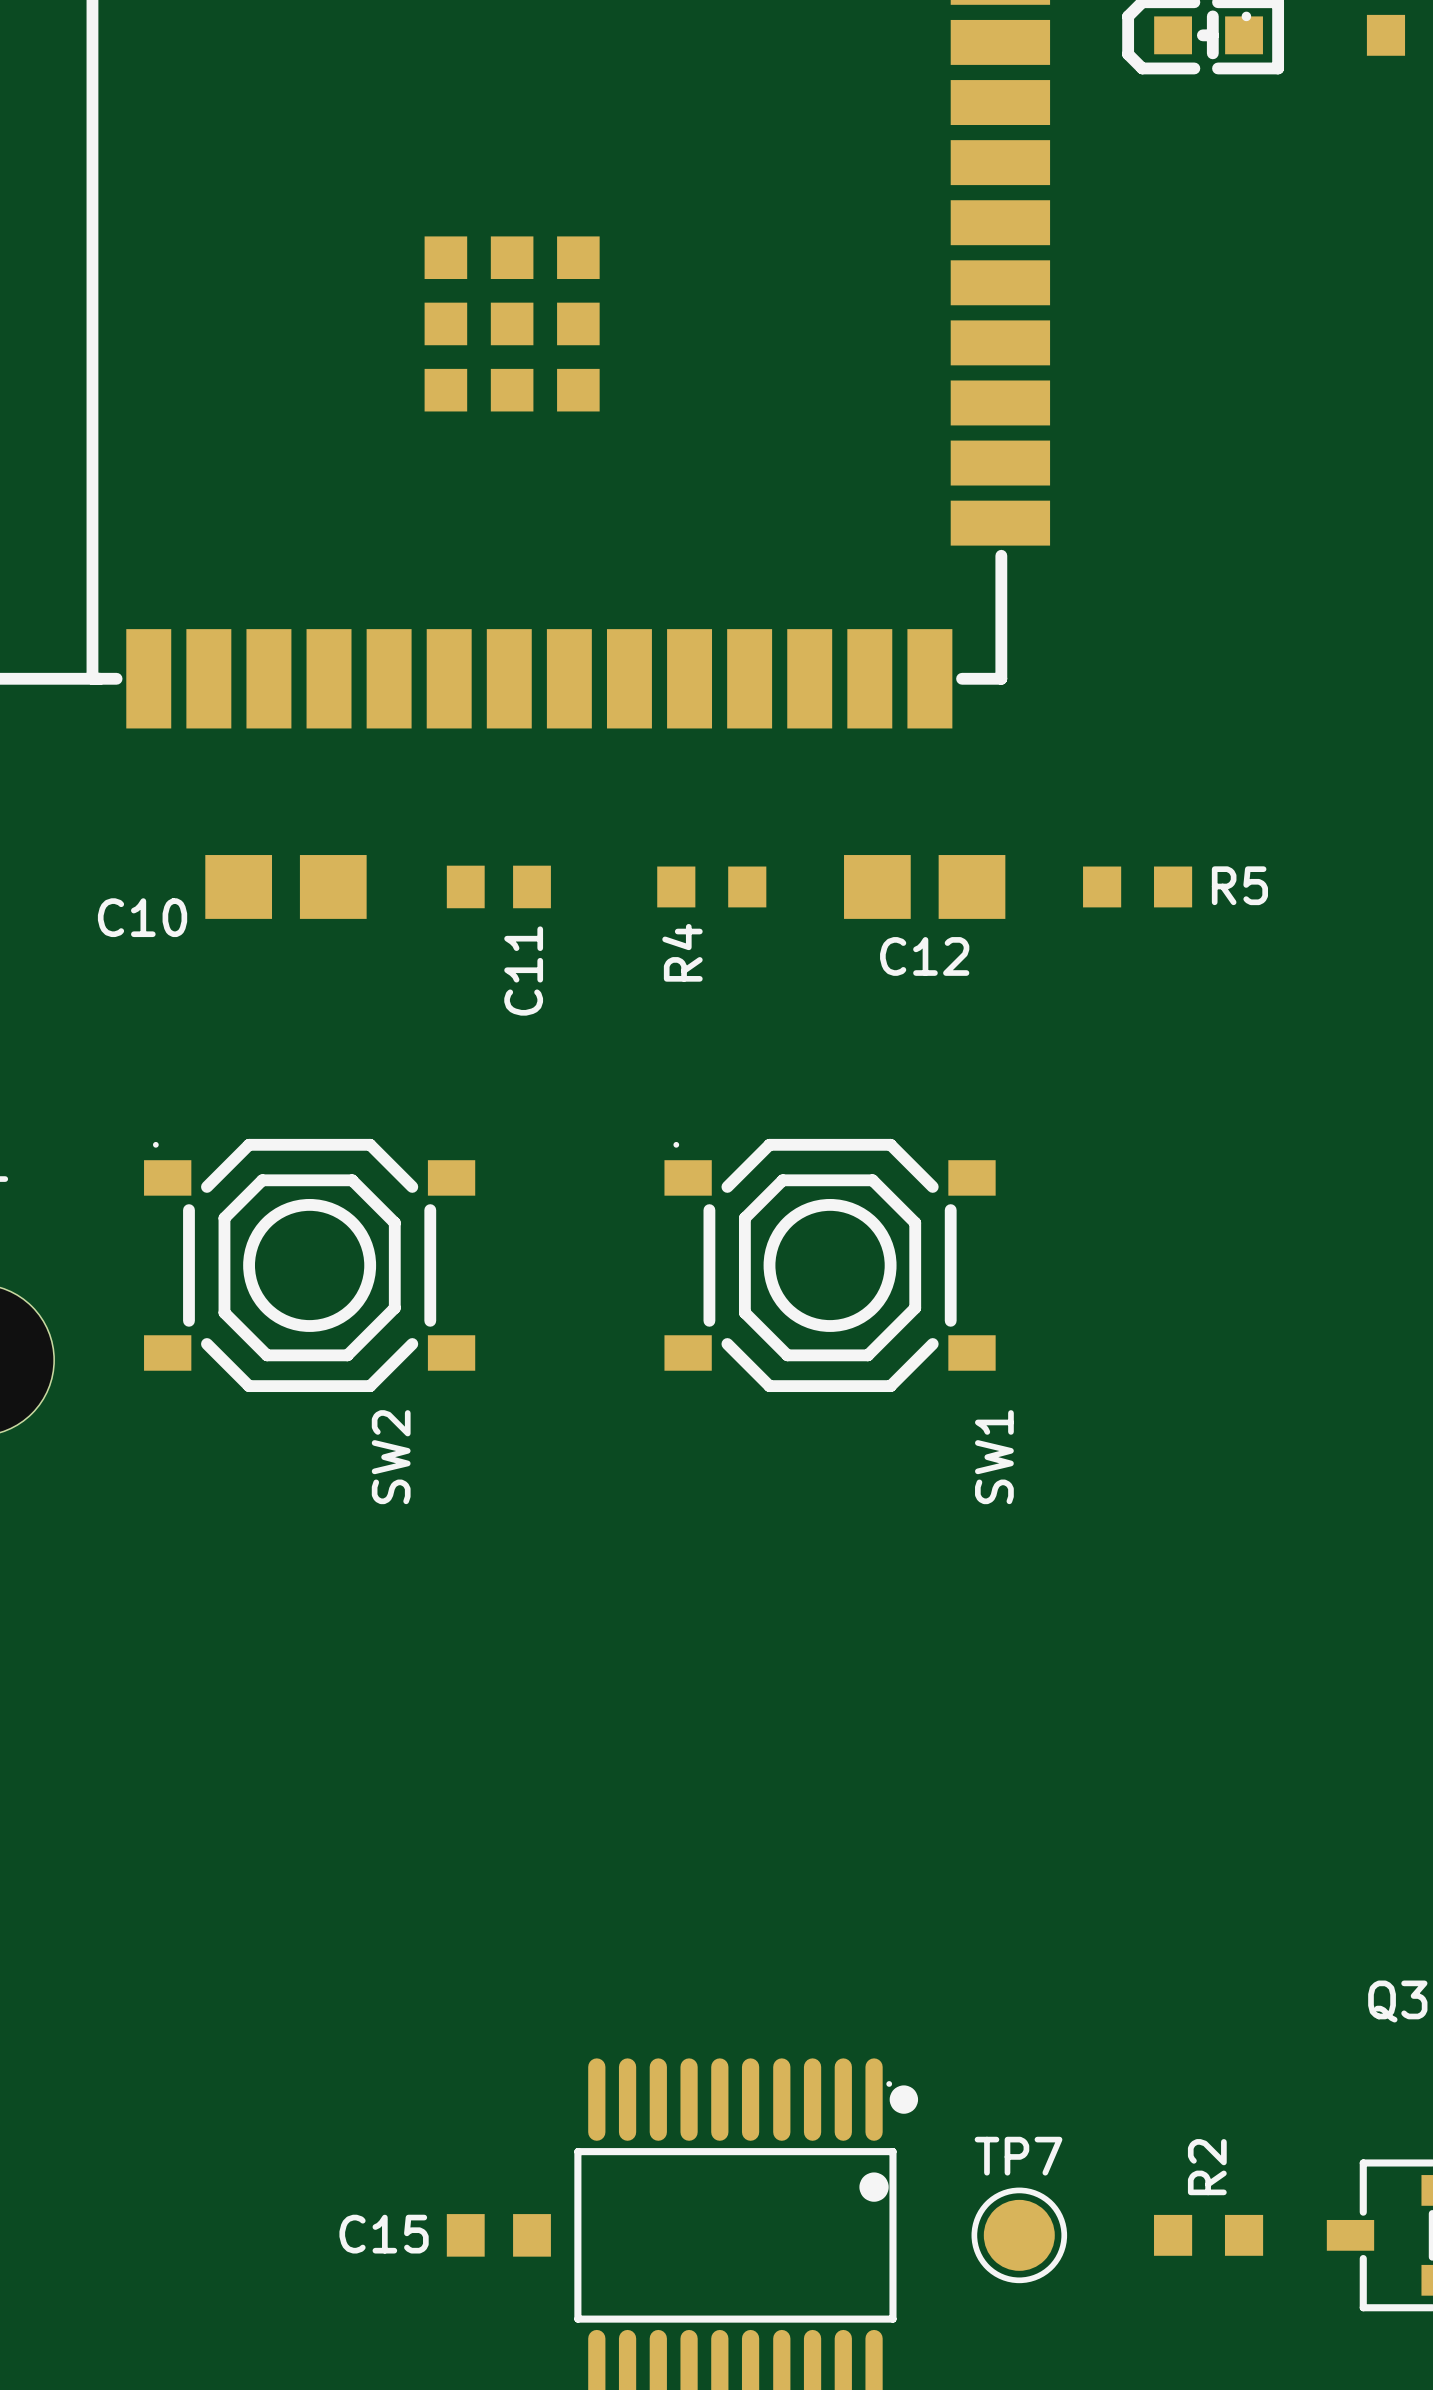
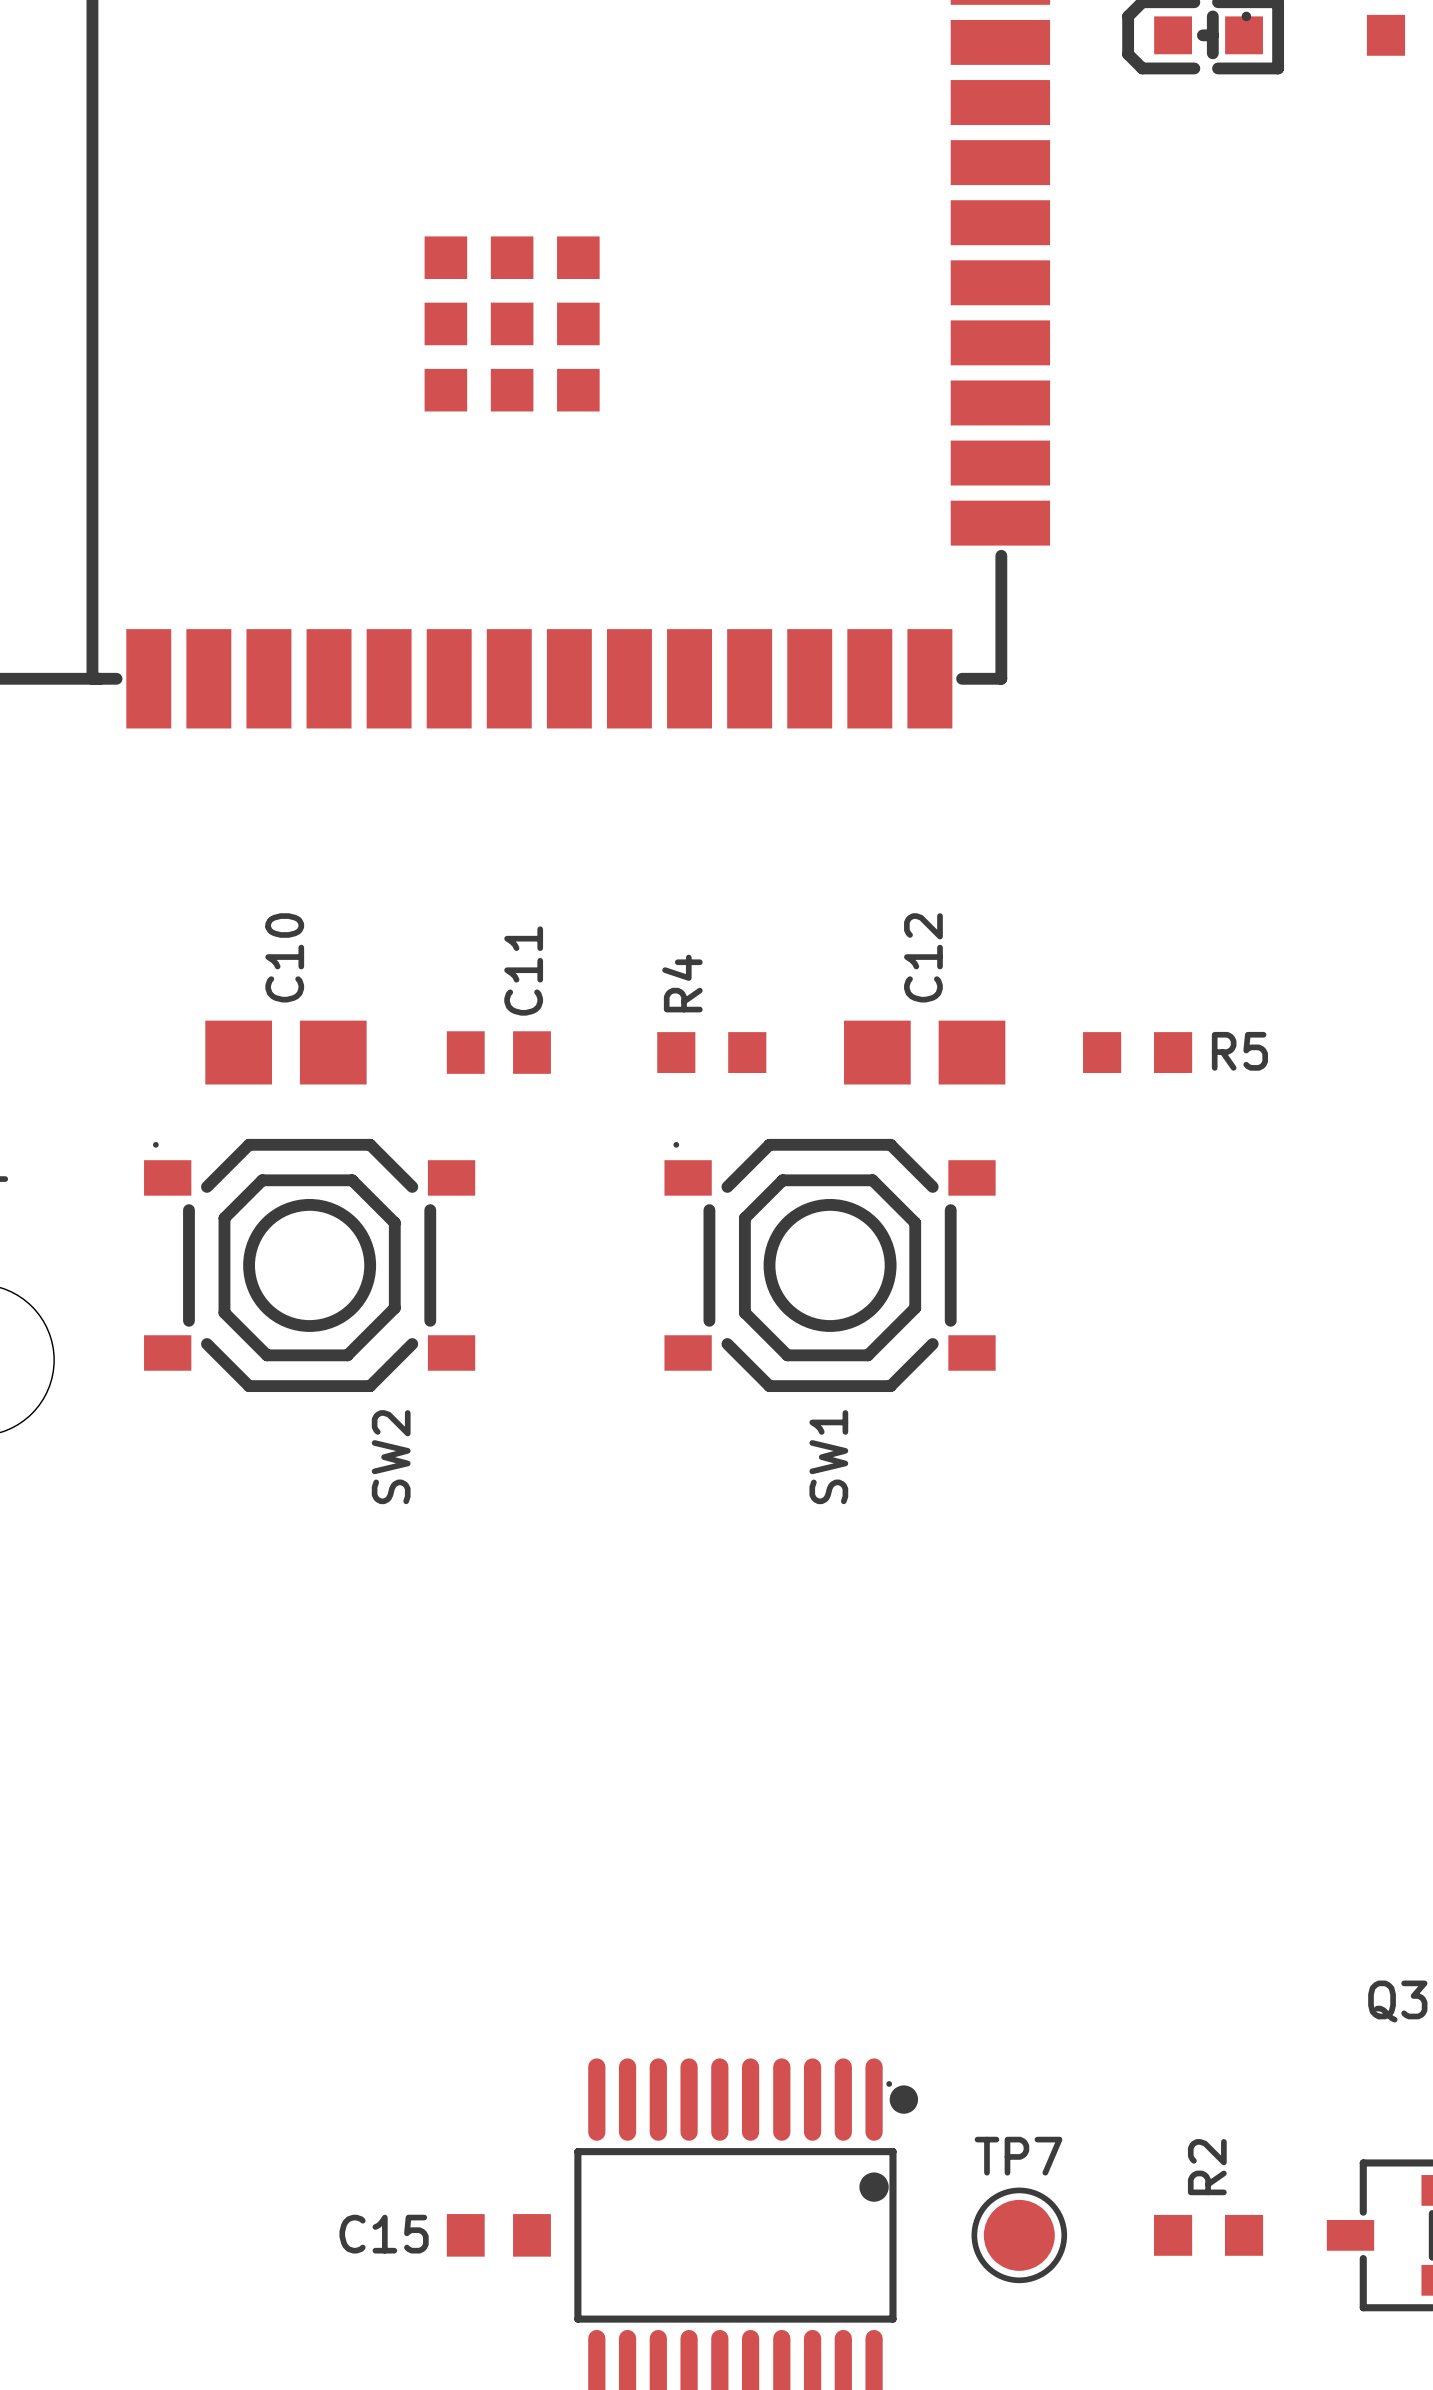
C10 position: (285, 886) -> (285, 1052)
C11 position: (498, 886) -> (498, 1052)
R4 position: (711, 886) -> (711, 1052)
C12 position: (924, 886) -> (924, 1052)
R5 position: (1137, 886) -> (1137, 1052)
C10 name rotation: 0° (142, 917) -> 90° counterclockwise (284, 957)
C10 name position: C10 (142, 917) -> C10 (284, 957)
R4 name position: R4 (682, 952) -> R4 (682, 983)
C12 name rotation: 0° (924, 956) -> 90° counterclockwise (923, 957)
SW1 name position: SW1 (994, 1457) -> SW1 (828, 1457)

